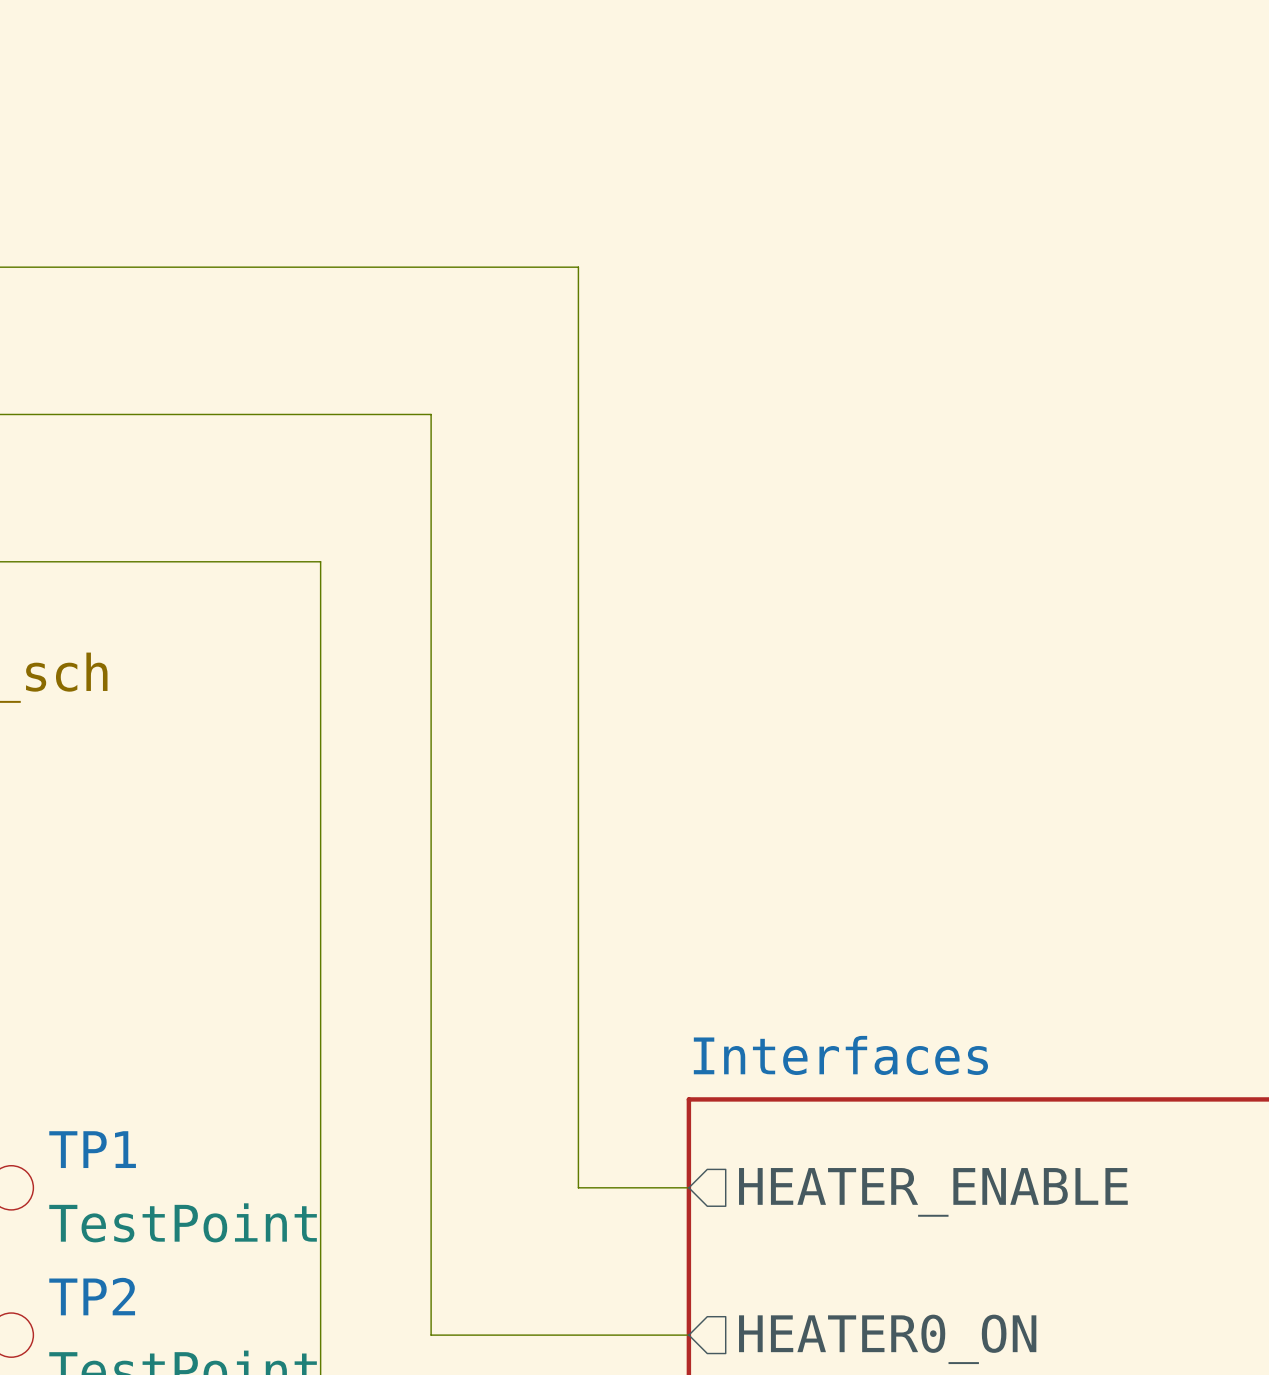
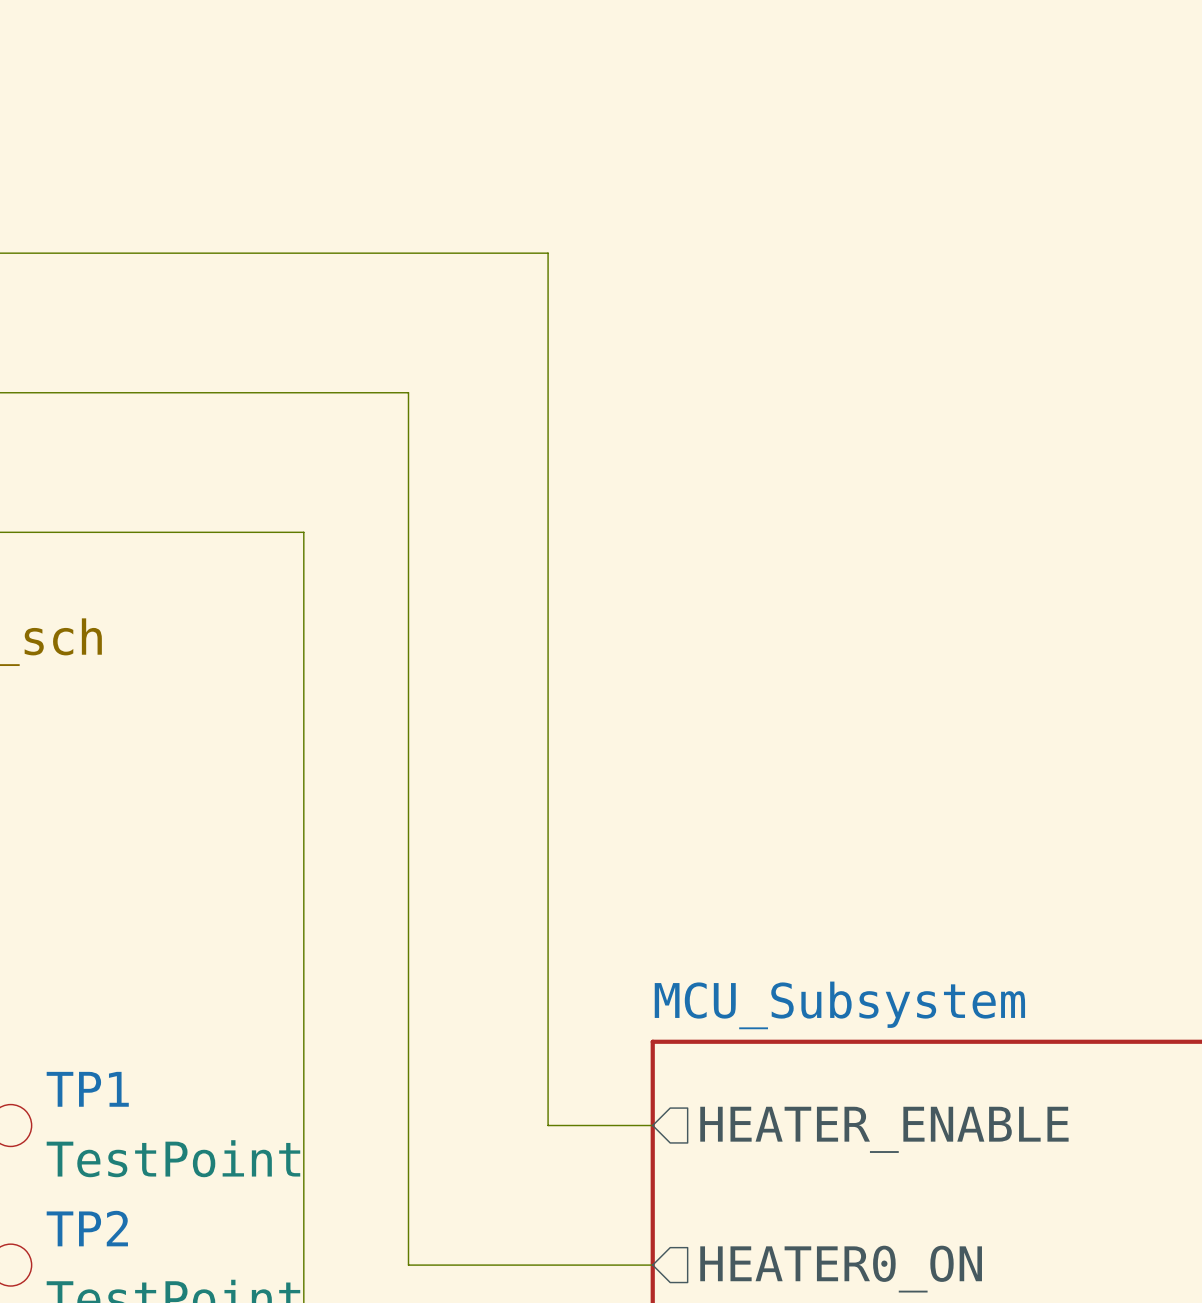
sheet Interfaces name: Interfaces (840, 1055) -> MCU_Subsystem (839, 1005)

